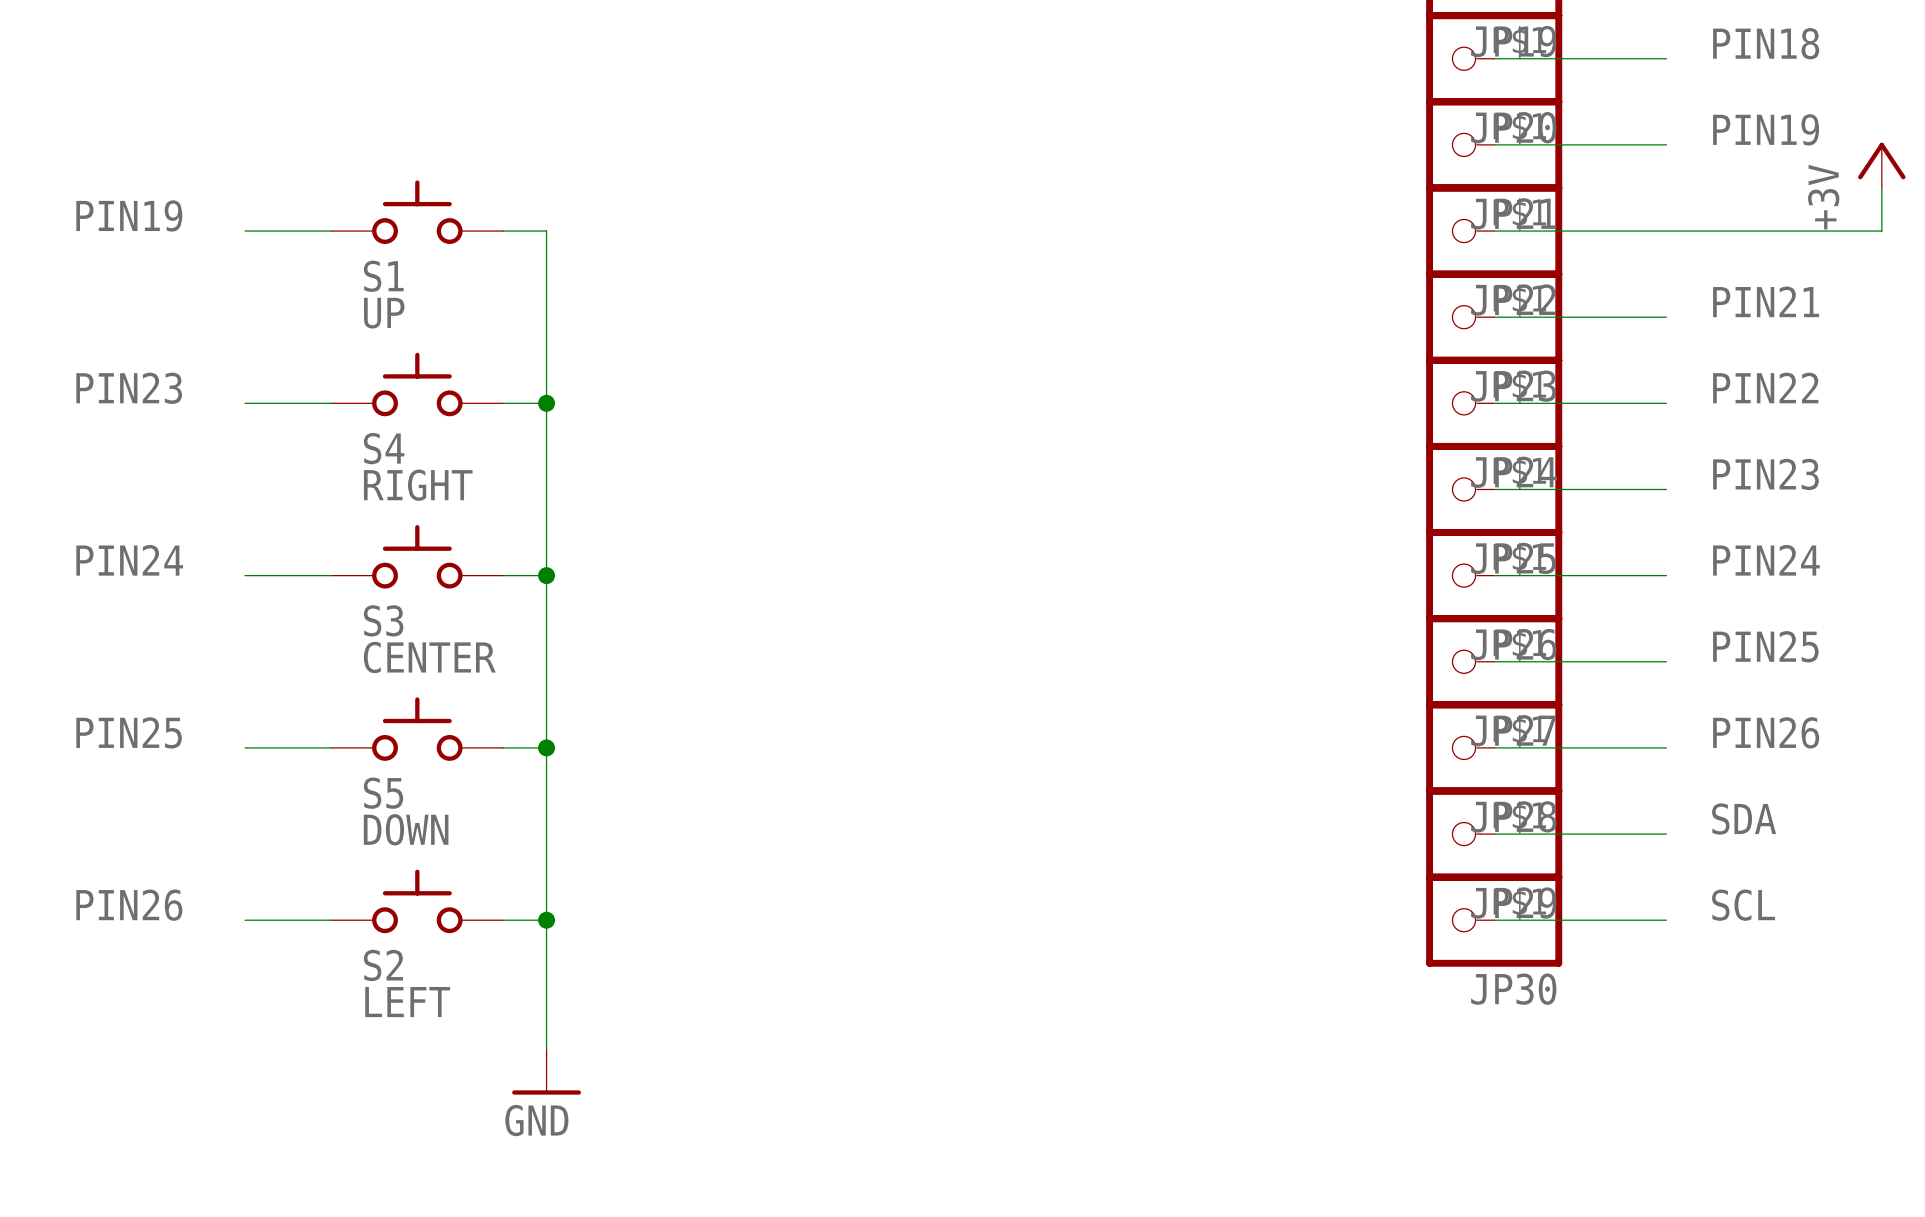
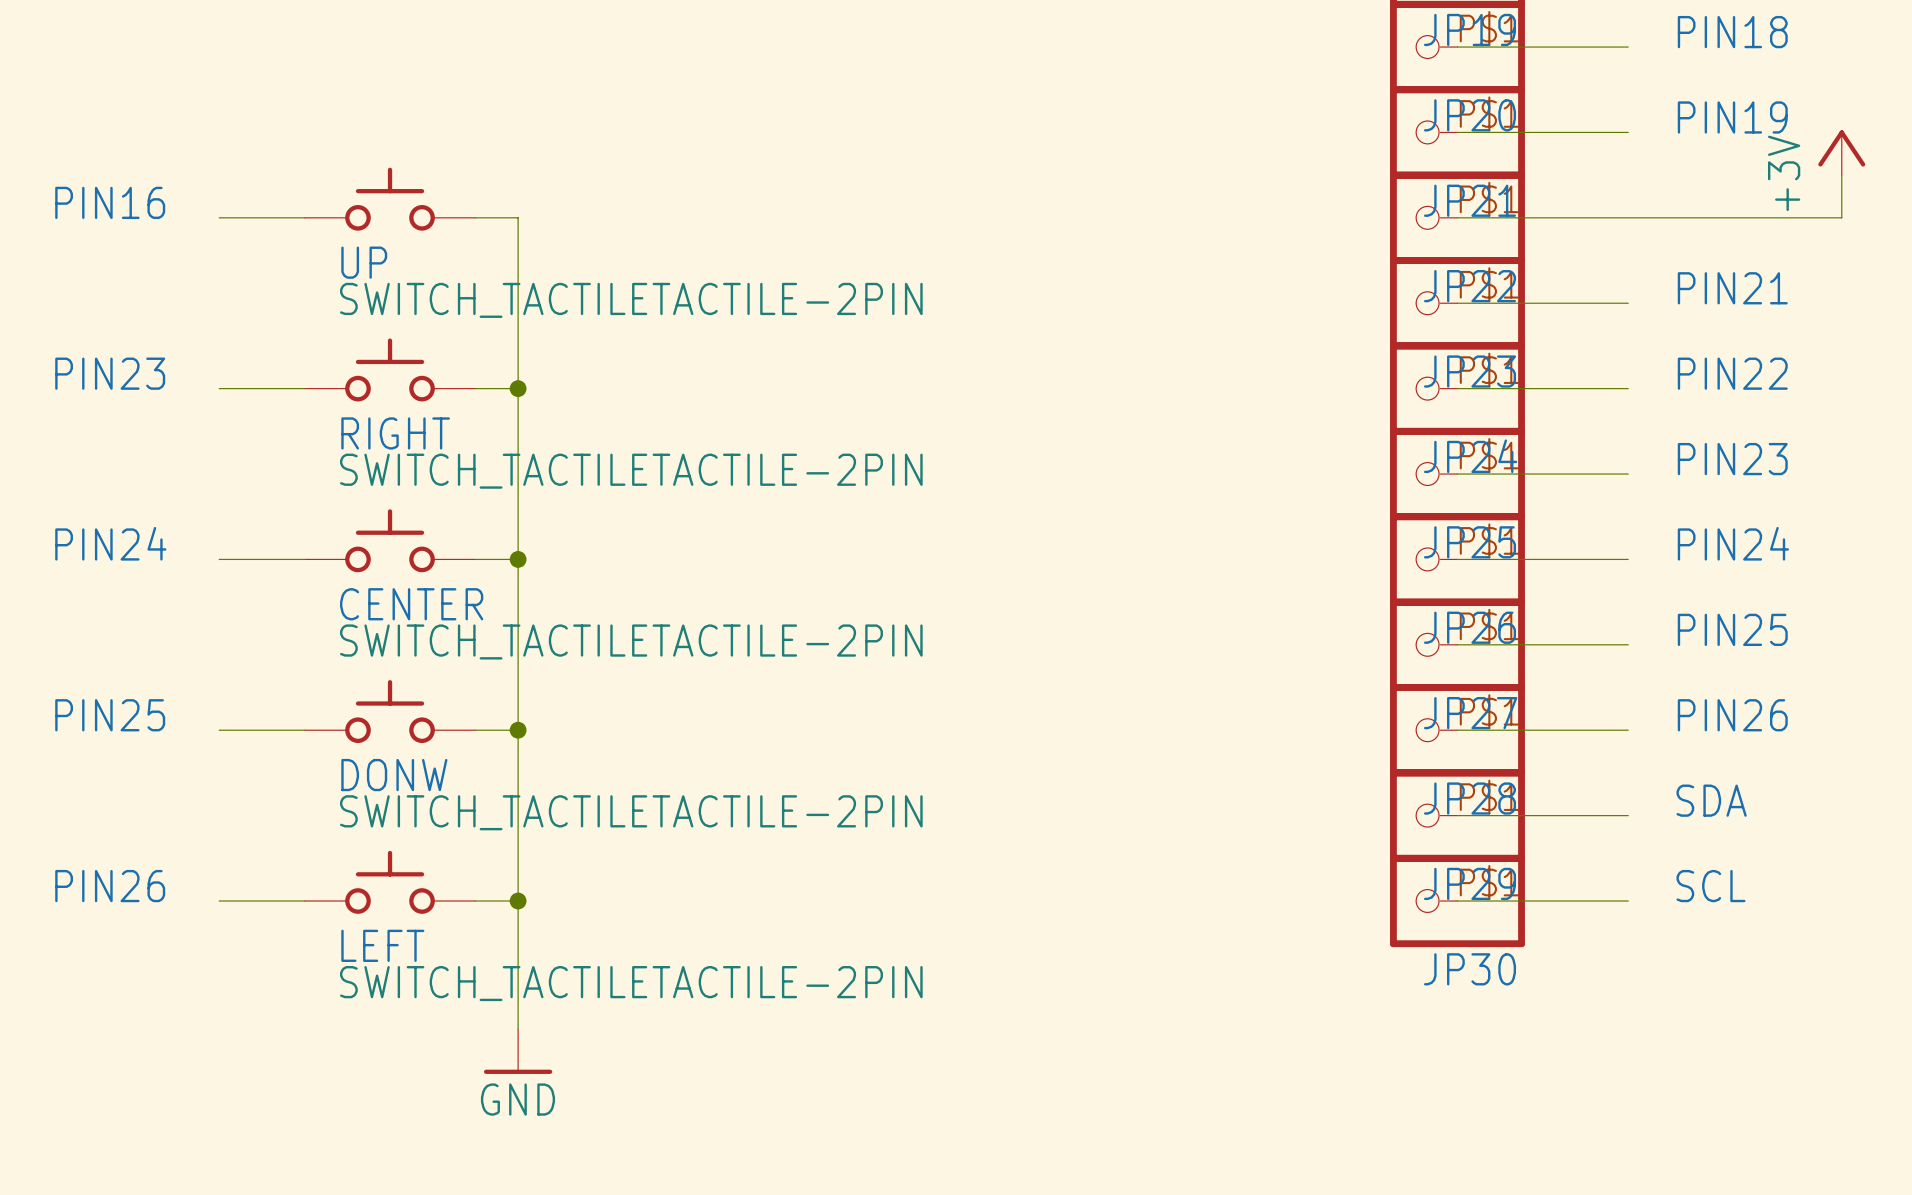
text: PIN19 (129, 215) -> PIN16 (110, 202)
S1 name: S1 (383, 276) -> UP (364, 262)
S1 value: UP (384, 313) -> SWITCH_TACTILETACTILE-2PIN (631, 300)
S4 name: S4 (384, 448) -> RIGHT (395, 433)
S4 value: RIGHT (418, 485) -> SWITCH_TACTILETACTILE-2PIN (631, 471)
S3 name: S3 (383, 620) -> CENTER (411, 604)
S3 value: CENTER (429, 657) -> SWITCH_TACTILETACTILE-2PIN (631, 641)
S5 name: S5 (383, 793) -> DONW (394, 775)
S5 value: DOWN (406, 829) -> SWITCH_TACTILETACTILE-2PIN (631, 812)
S2 name: S2 (383, 965) -> LEFT (382, 945)
S2 value: LEFT (407, 1002) -> SWITCH_TACTILETACTILE-2PIN (631, 983)

